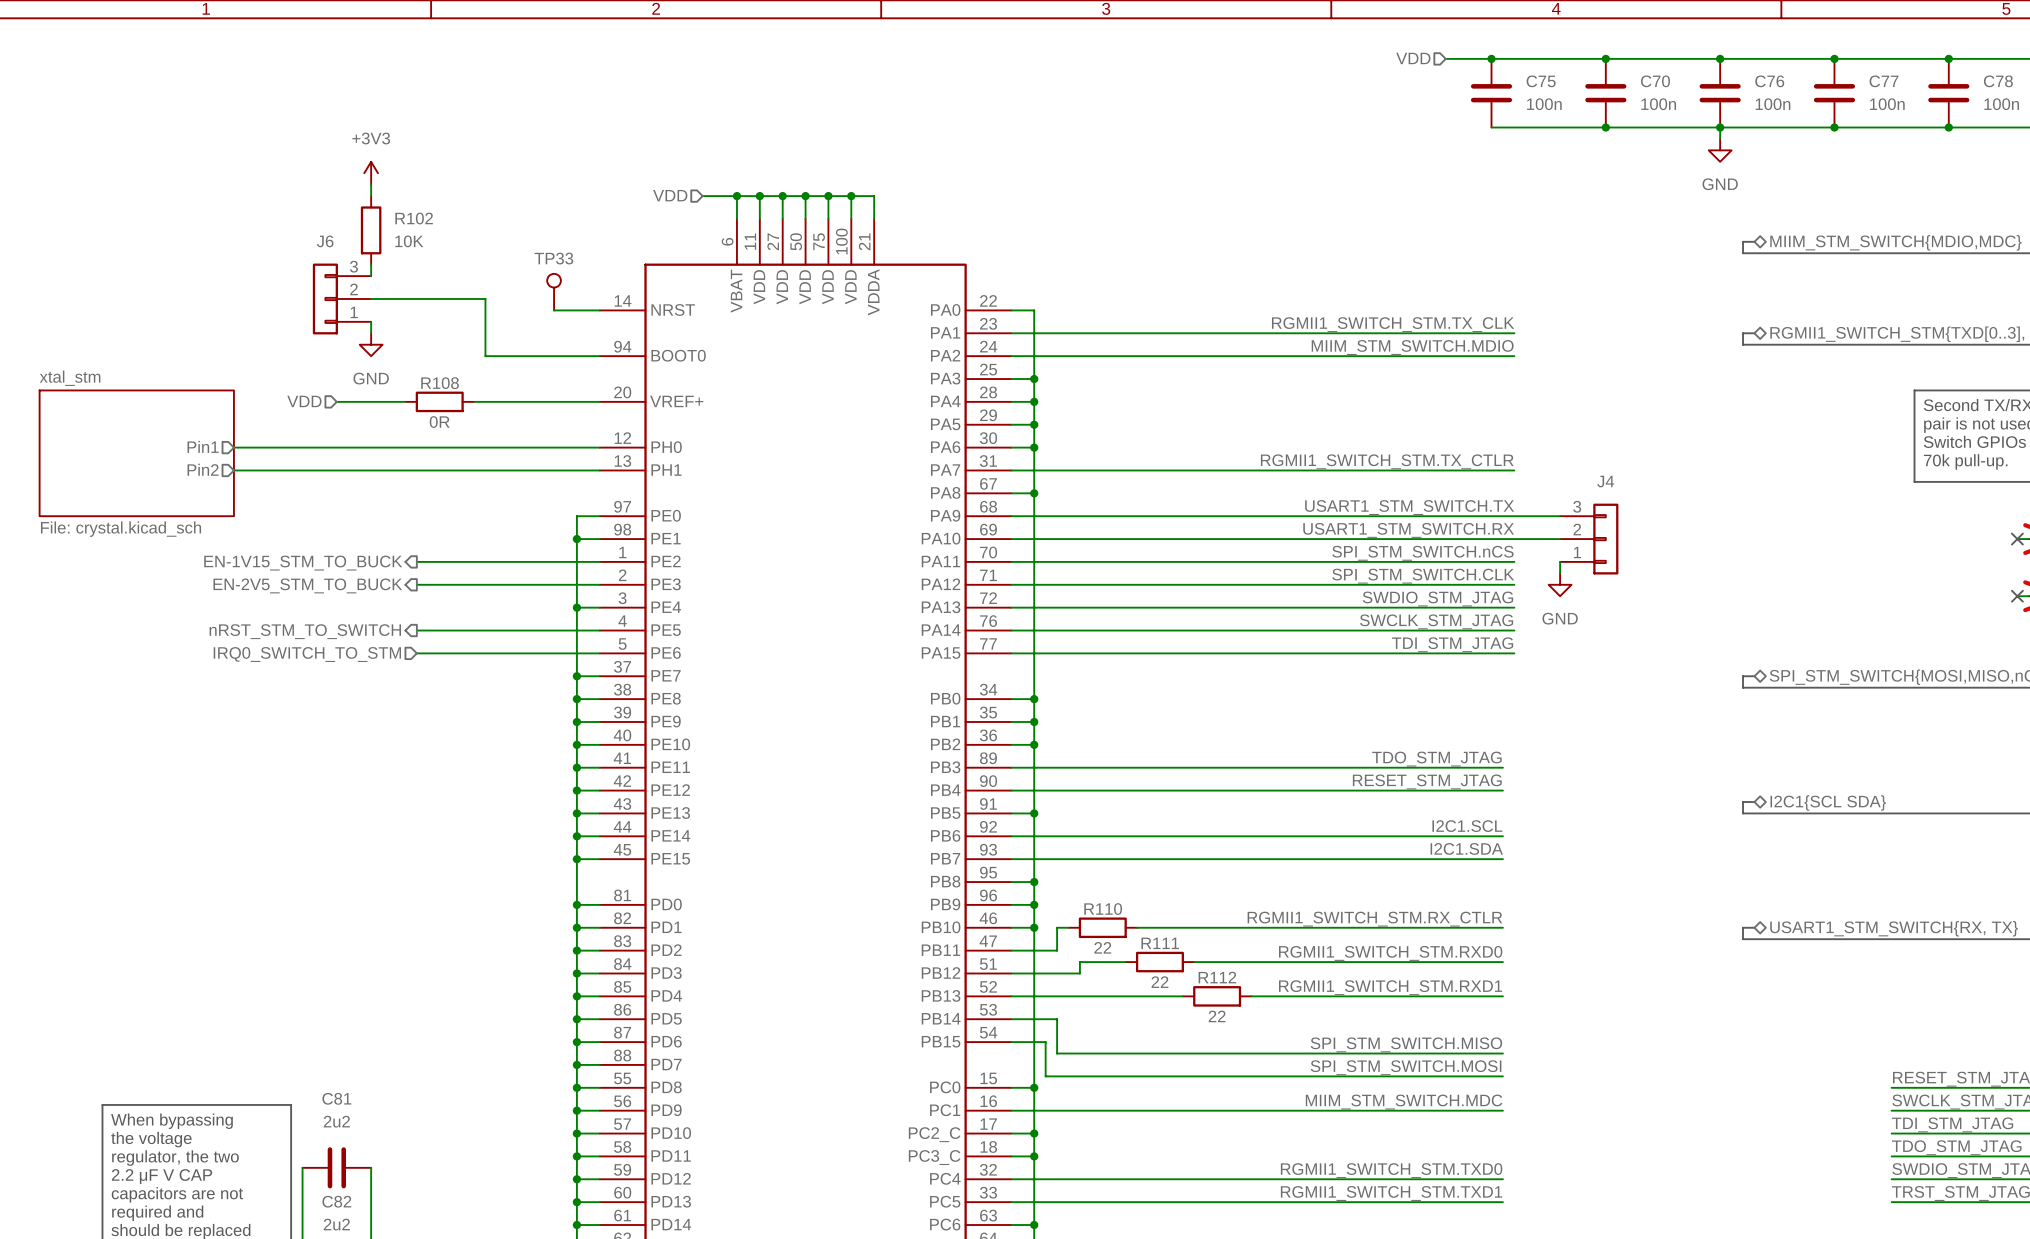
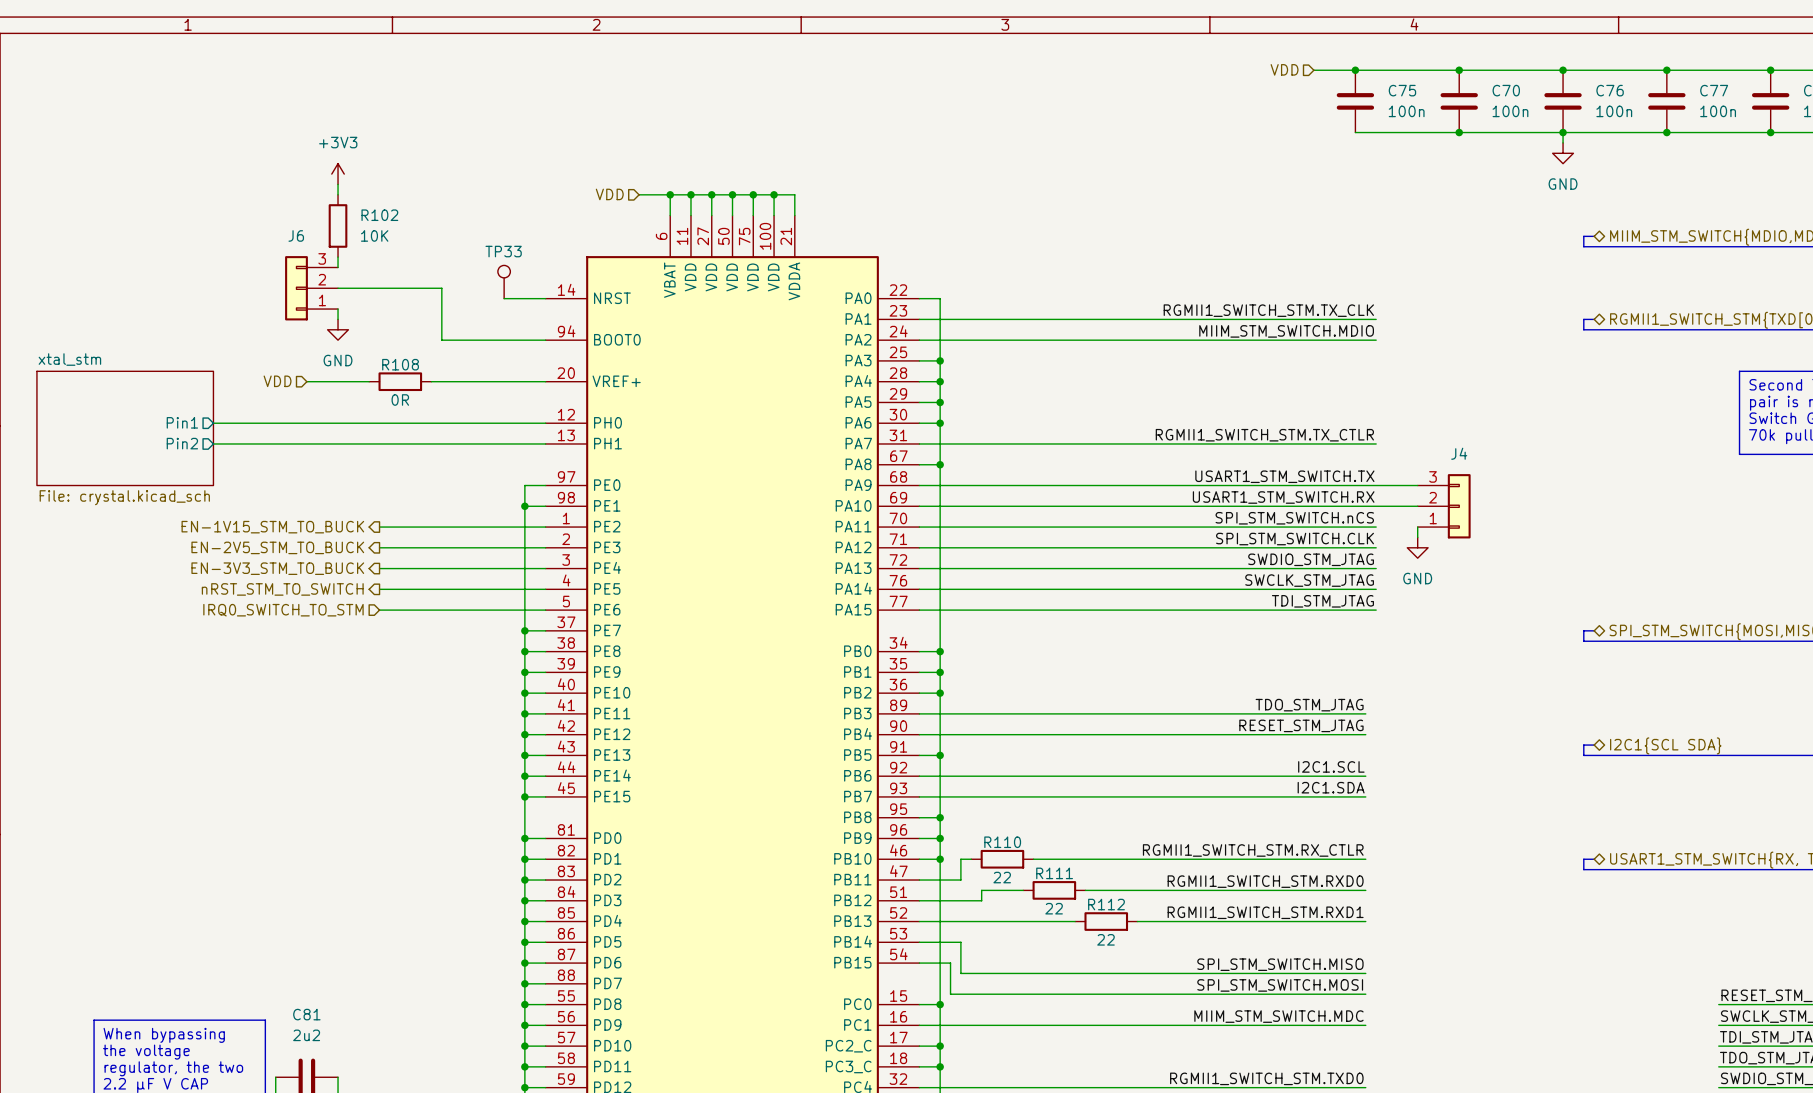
wire: none -> (379, 568) (524, 568)
junction: (576, 607) -> none
hierarchical label: none -> EN-3V3_STM_TO_BUCK (277, 568)

